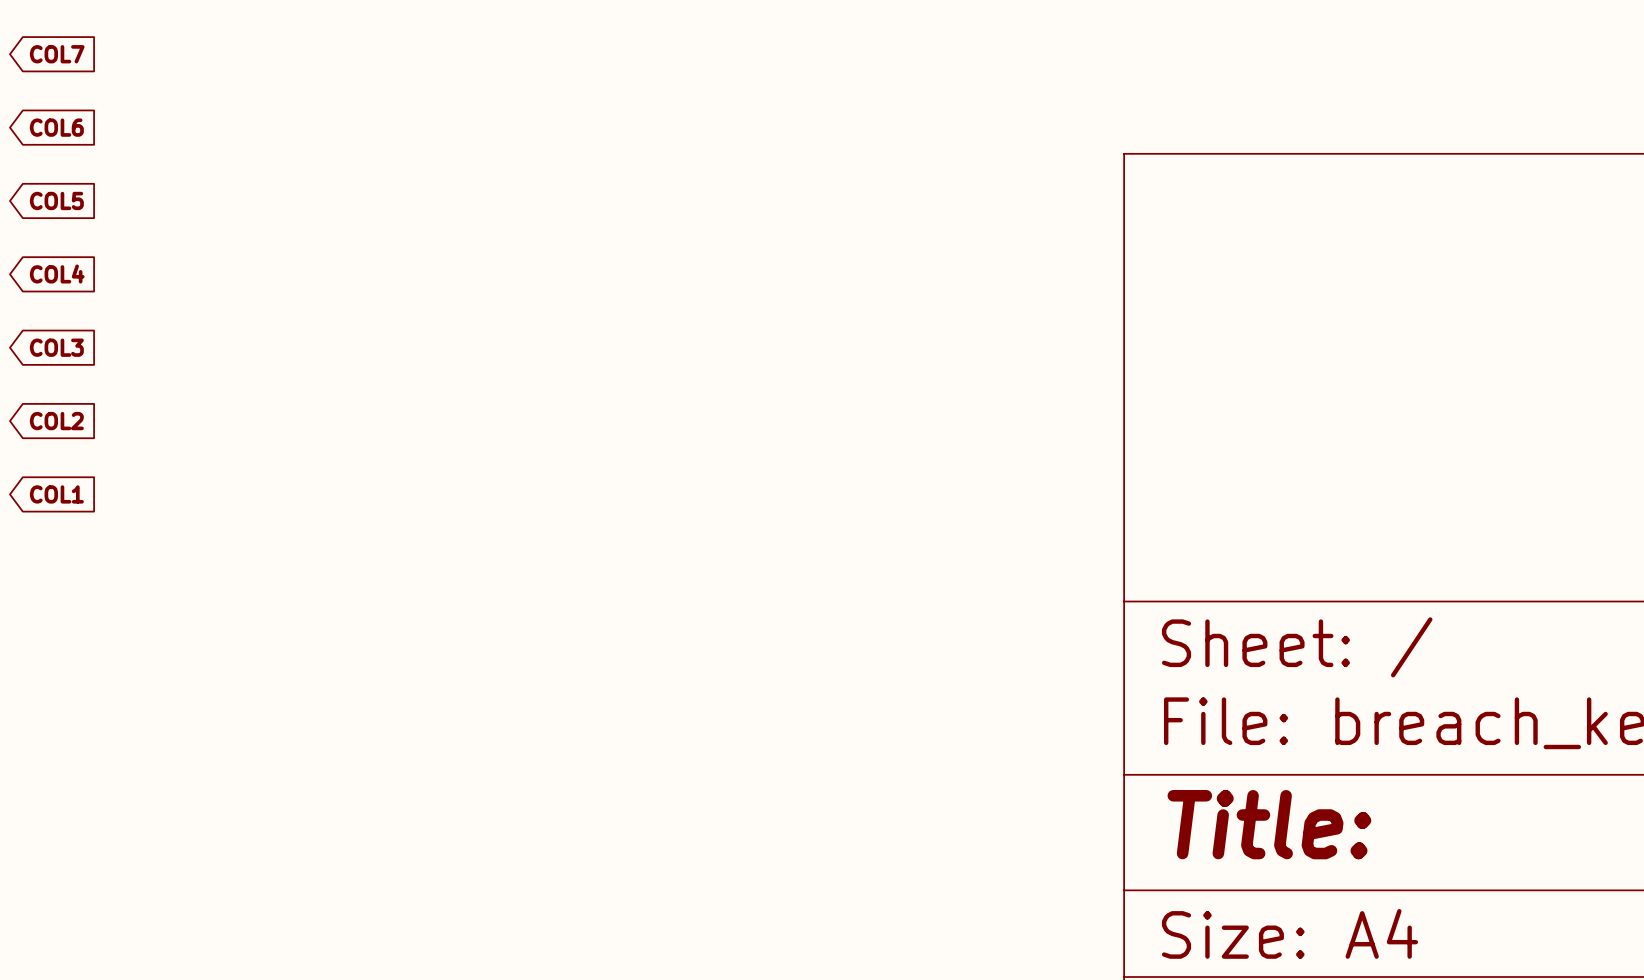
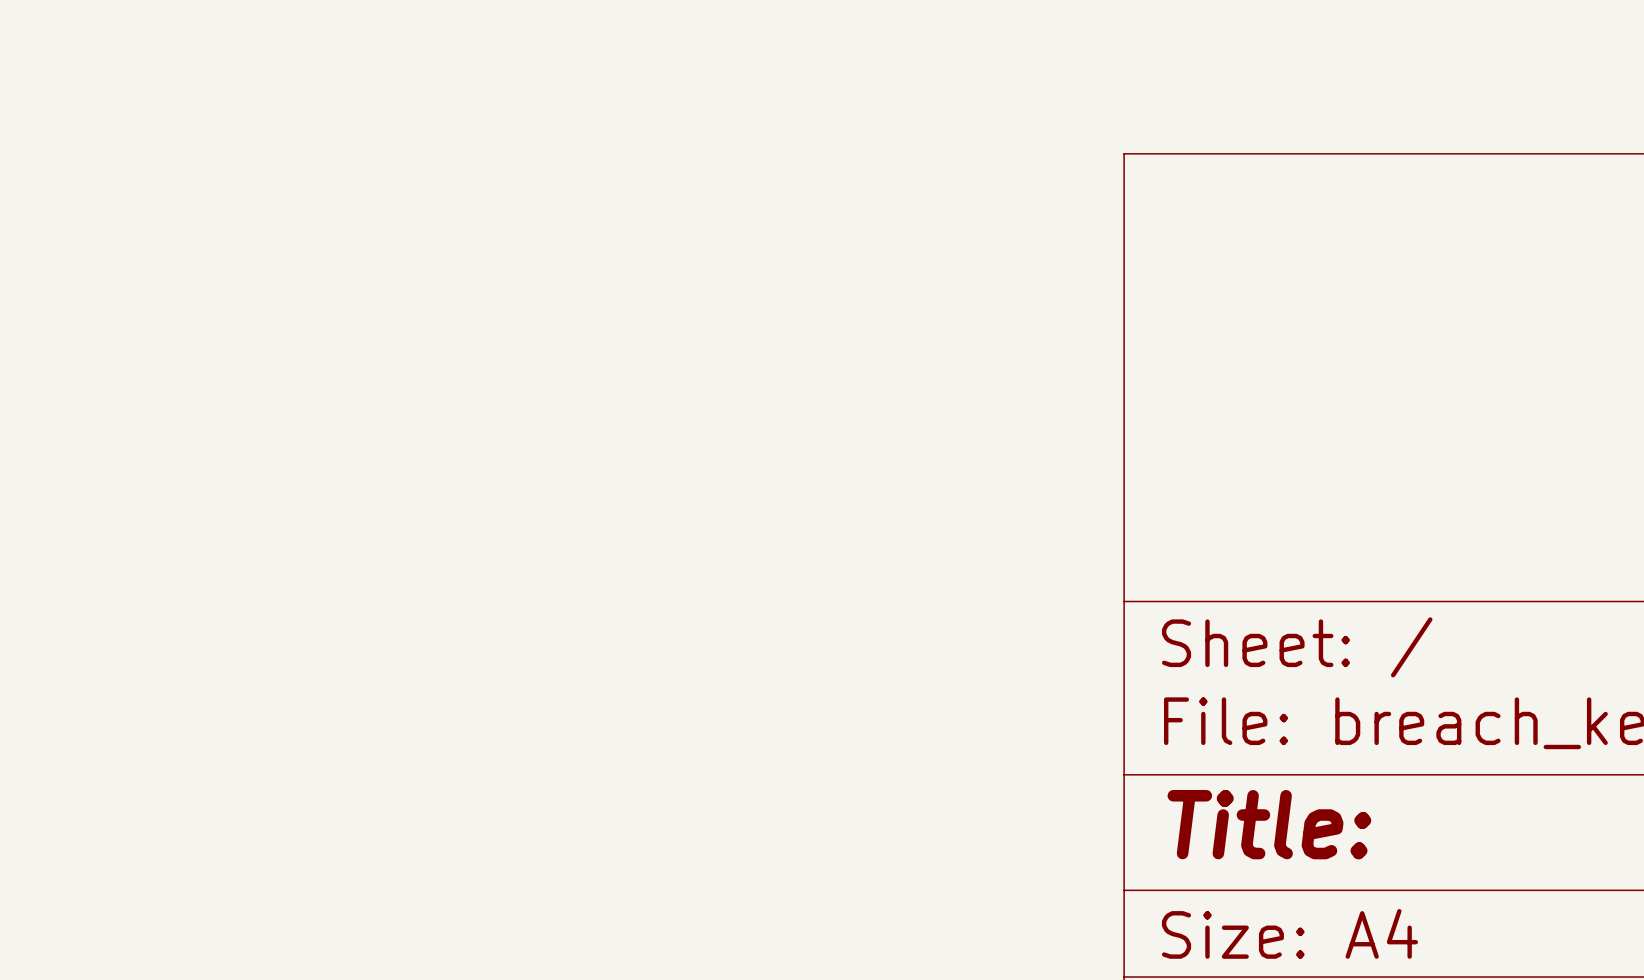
global label: COL7 (57, 54) -> none
global label: COL6 (56, 127) -> none
global label: COL5 (56, 200) -> none
global label: COL4 (57, 273) -> none
global label: COL3 (56, 347) -> none
global label: COL2 (56, 421) -> none
global label: COL1 (56, 494) -> none

